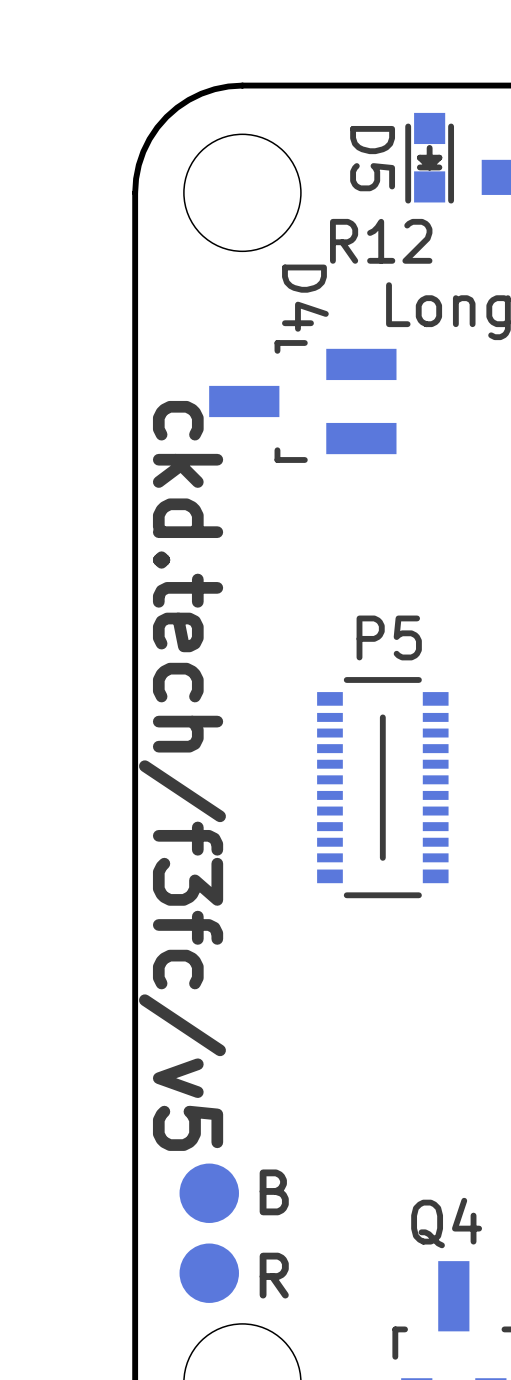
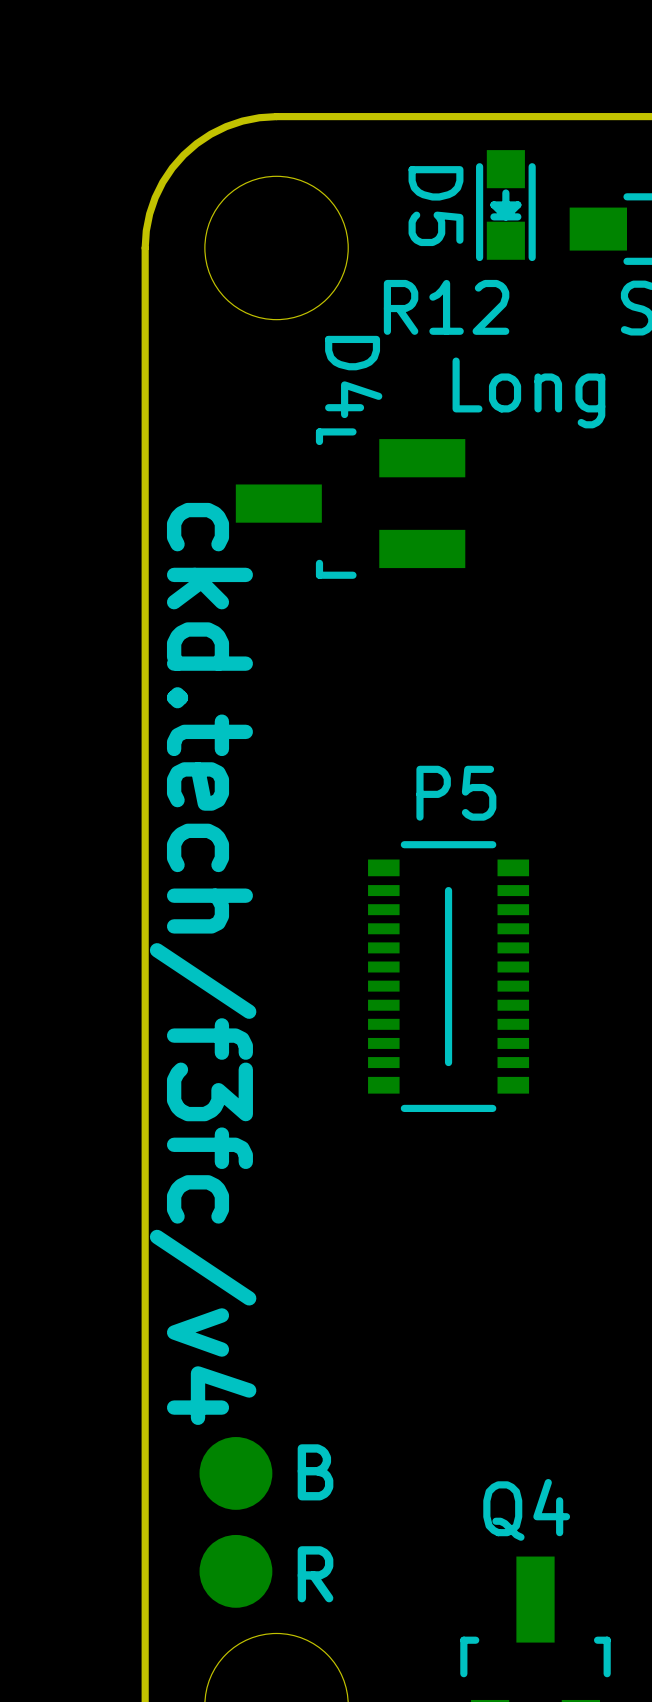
text: ckd.tech/f3fc/v5 (182, 775) -> ckd.tech/f3fc/v4 (203, 963)

